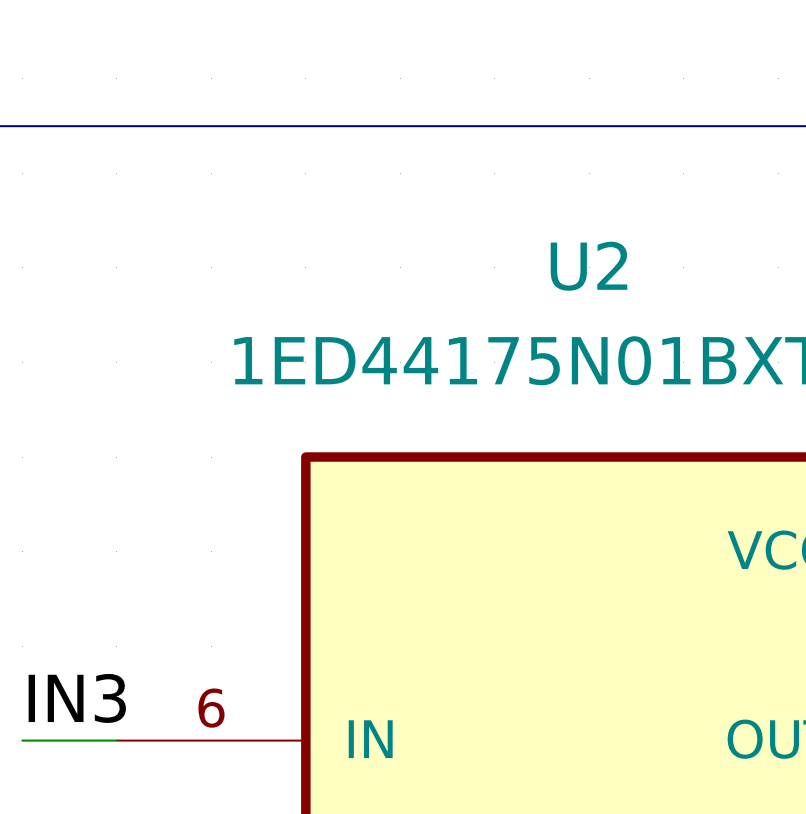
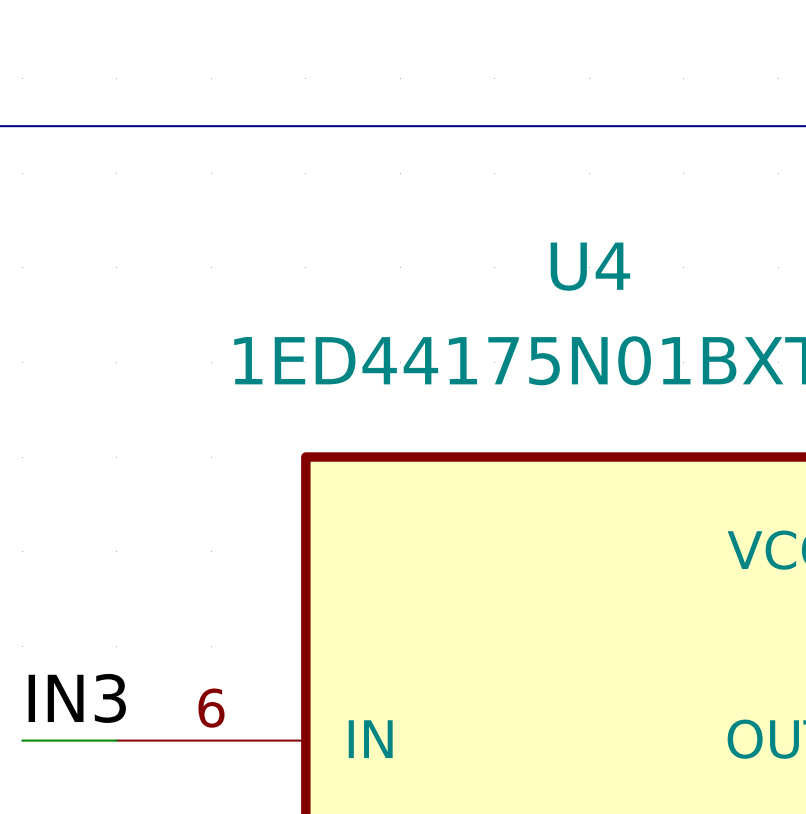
U2 name: U2 (588, 266) -> U4 (590, 266)

